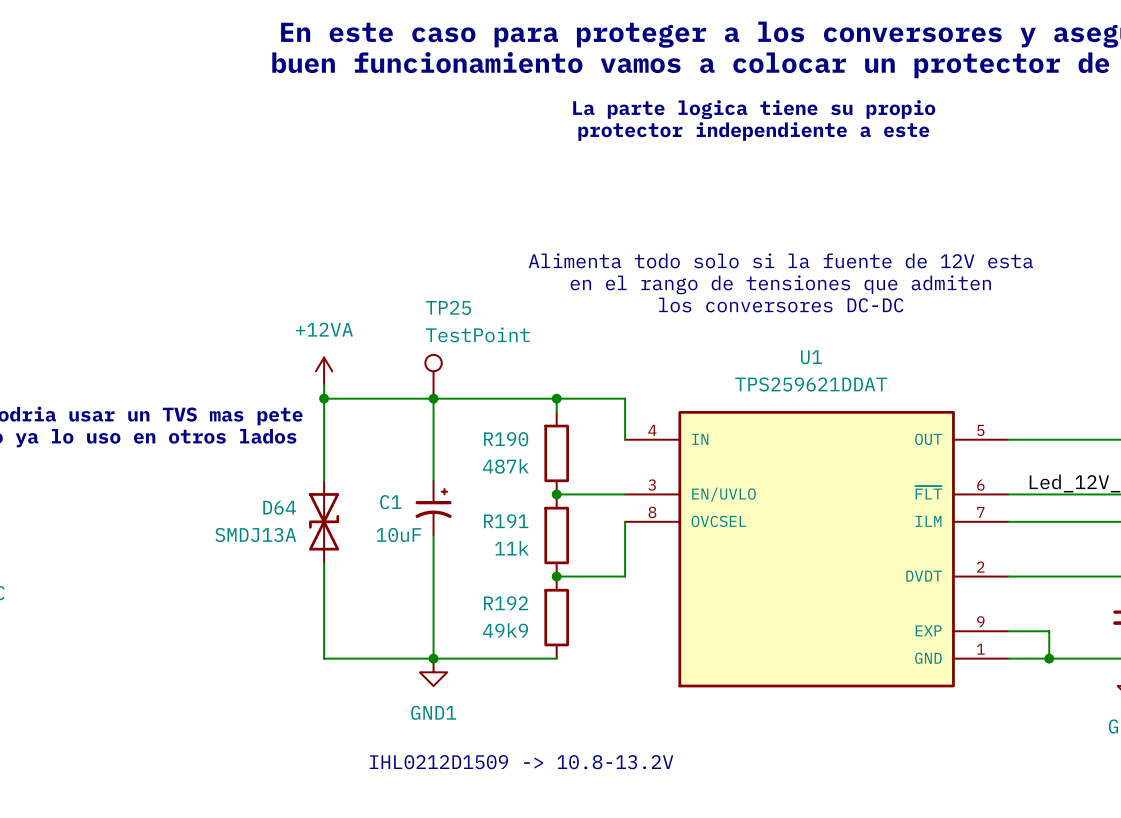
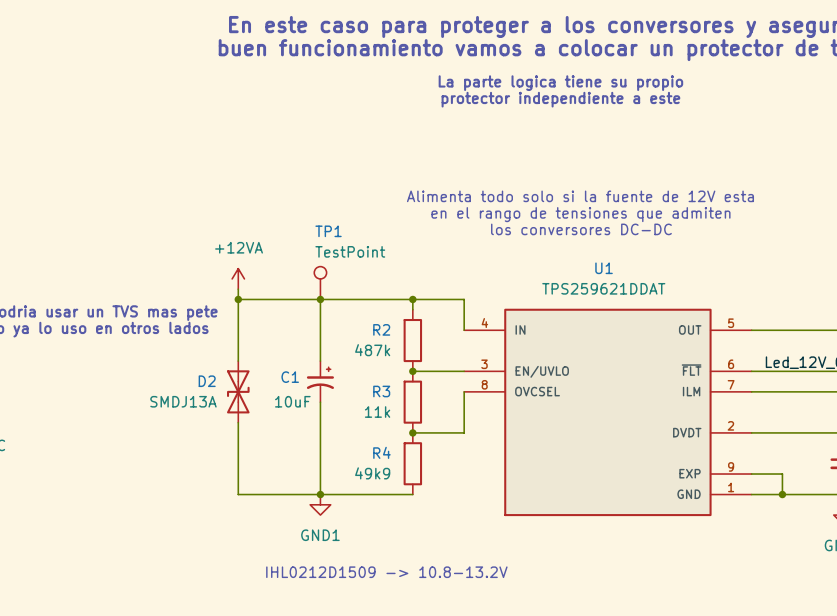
TP25 name: TP25 (448, 307) -> TP1 (328, 231)
R190 name: R190 (506, 439) -> R2 (381, 329)
D64 name: D64 (279, 507) -> D2 (207, 381)
R191 name: R191 (506, 521) -> R3 (381, 391)
R192 name: R192 (506, 603) -> R4 (381, 452)

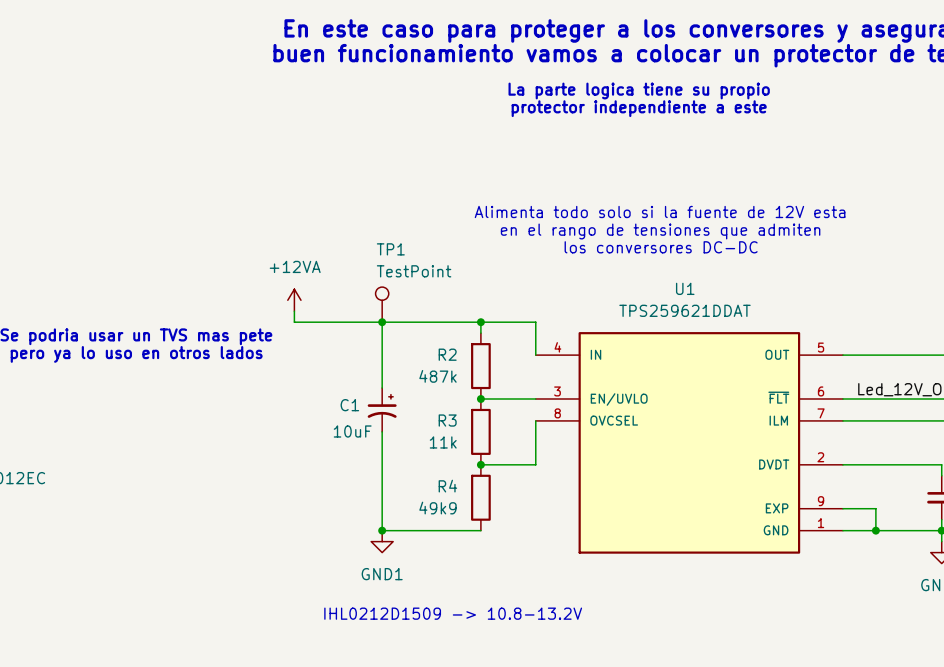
wire: (238, 299) (238, 361) -> none
junction: (238, 299) -> none
D2: SMDJ13A (238, 391) -> none
wire: (238, 422) (238, 494) (320, 494) -> none

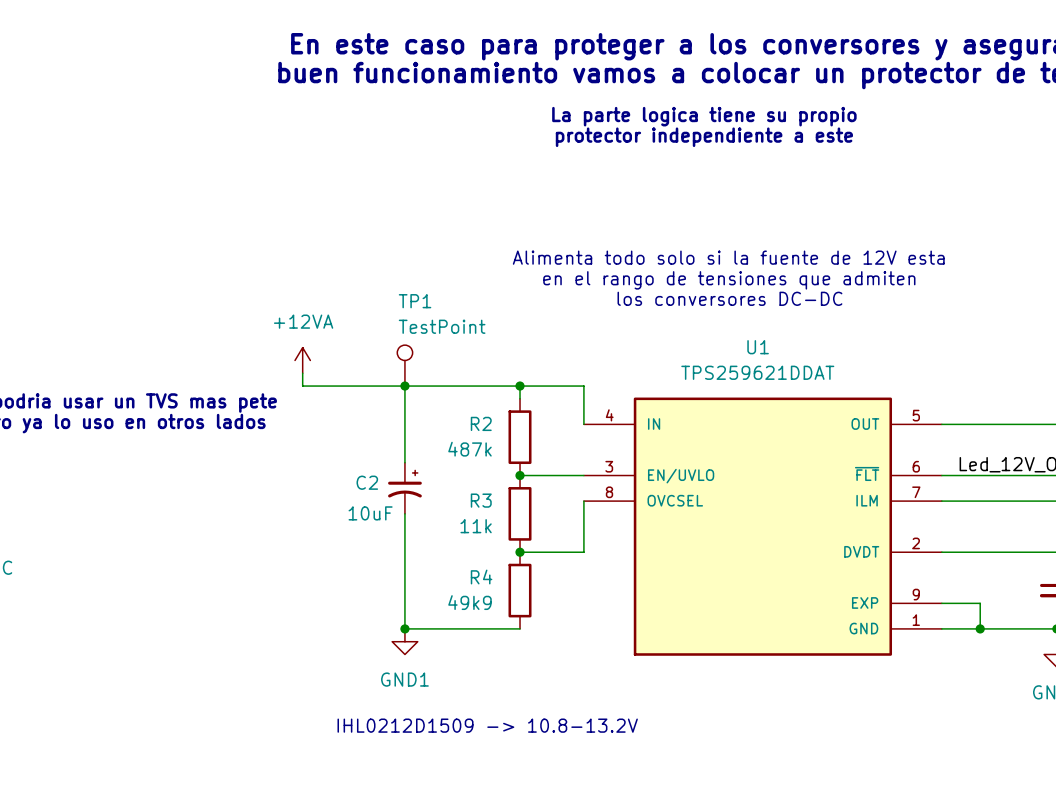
C1 name: C1 (349, 405) -> C2 (367, 482)

